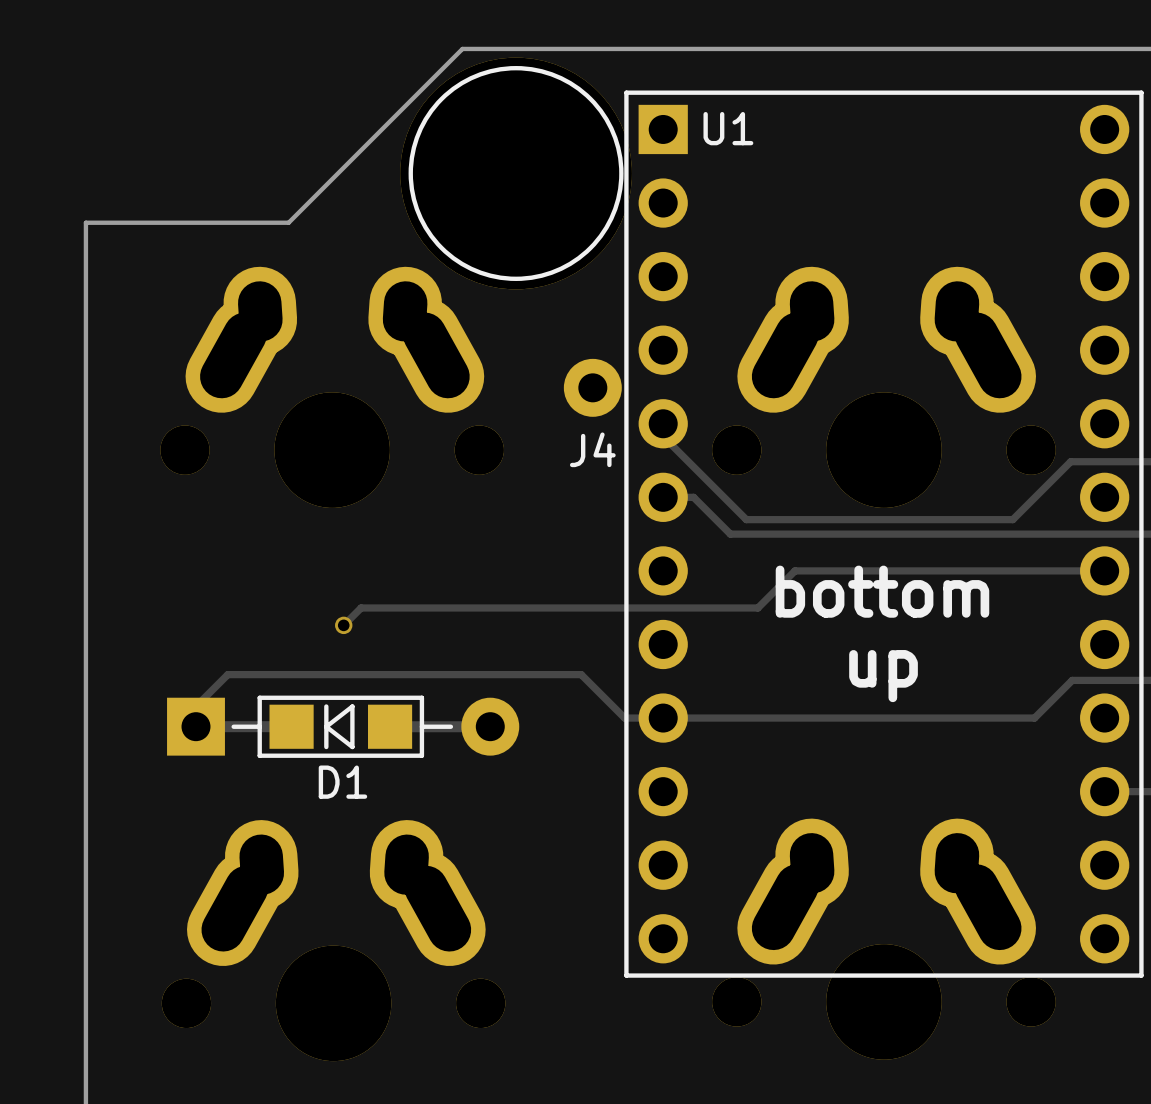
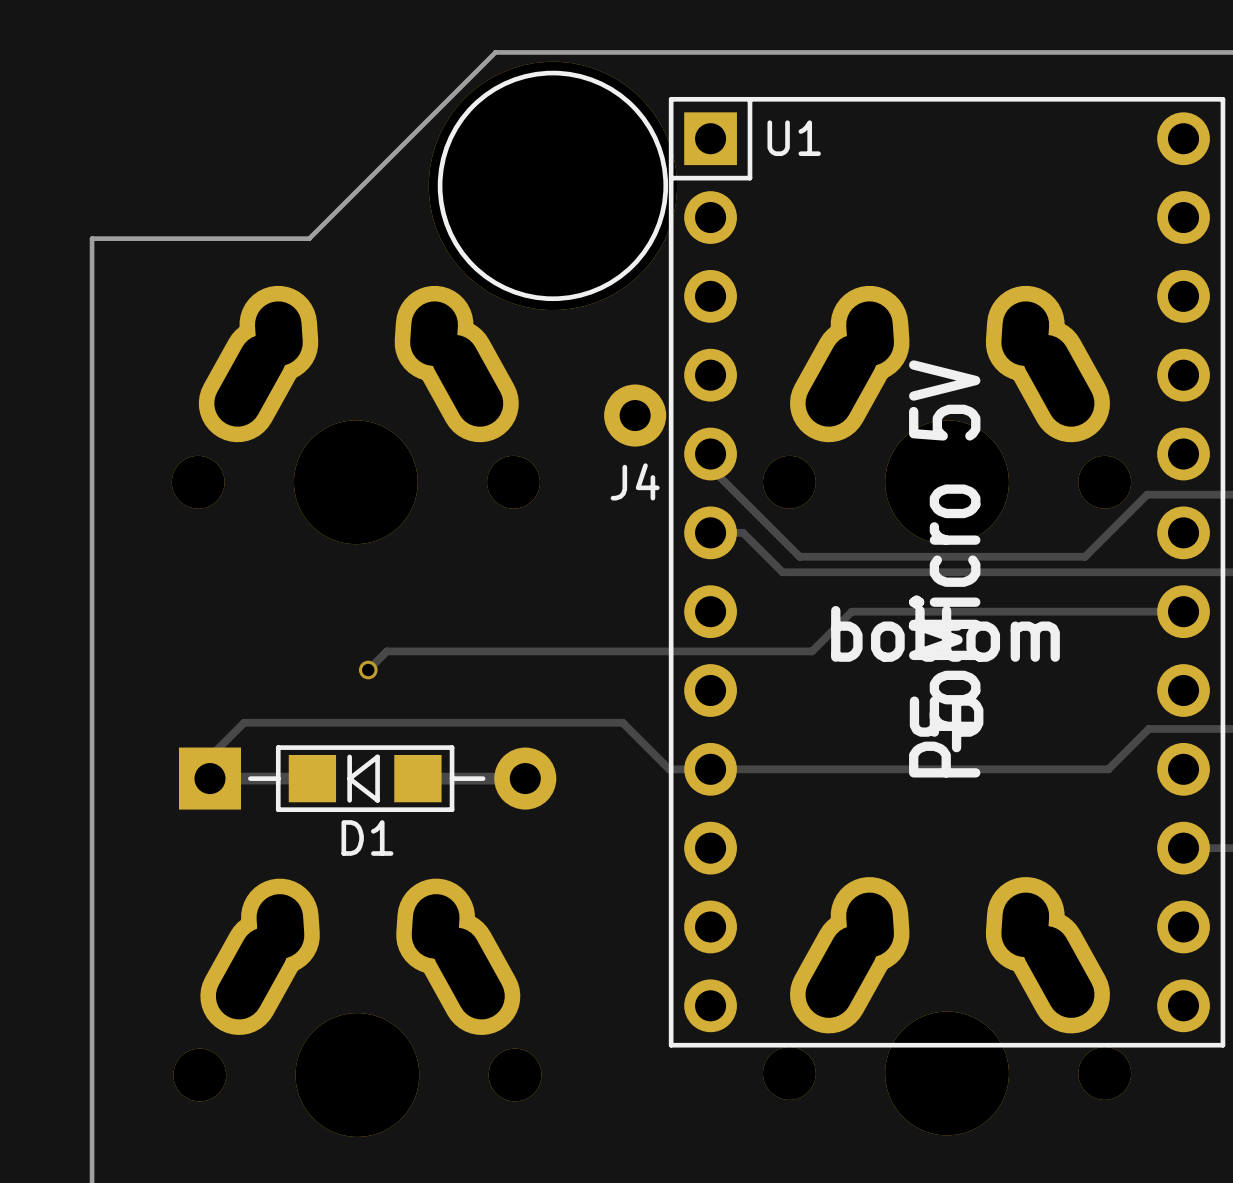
U1 footprint: [624, 90, 1144, 978] -> [668, 96, 1226, 1048]

